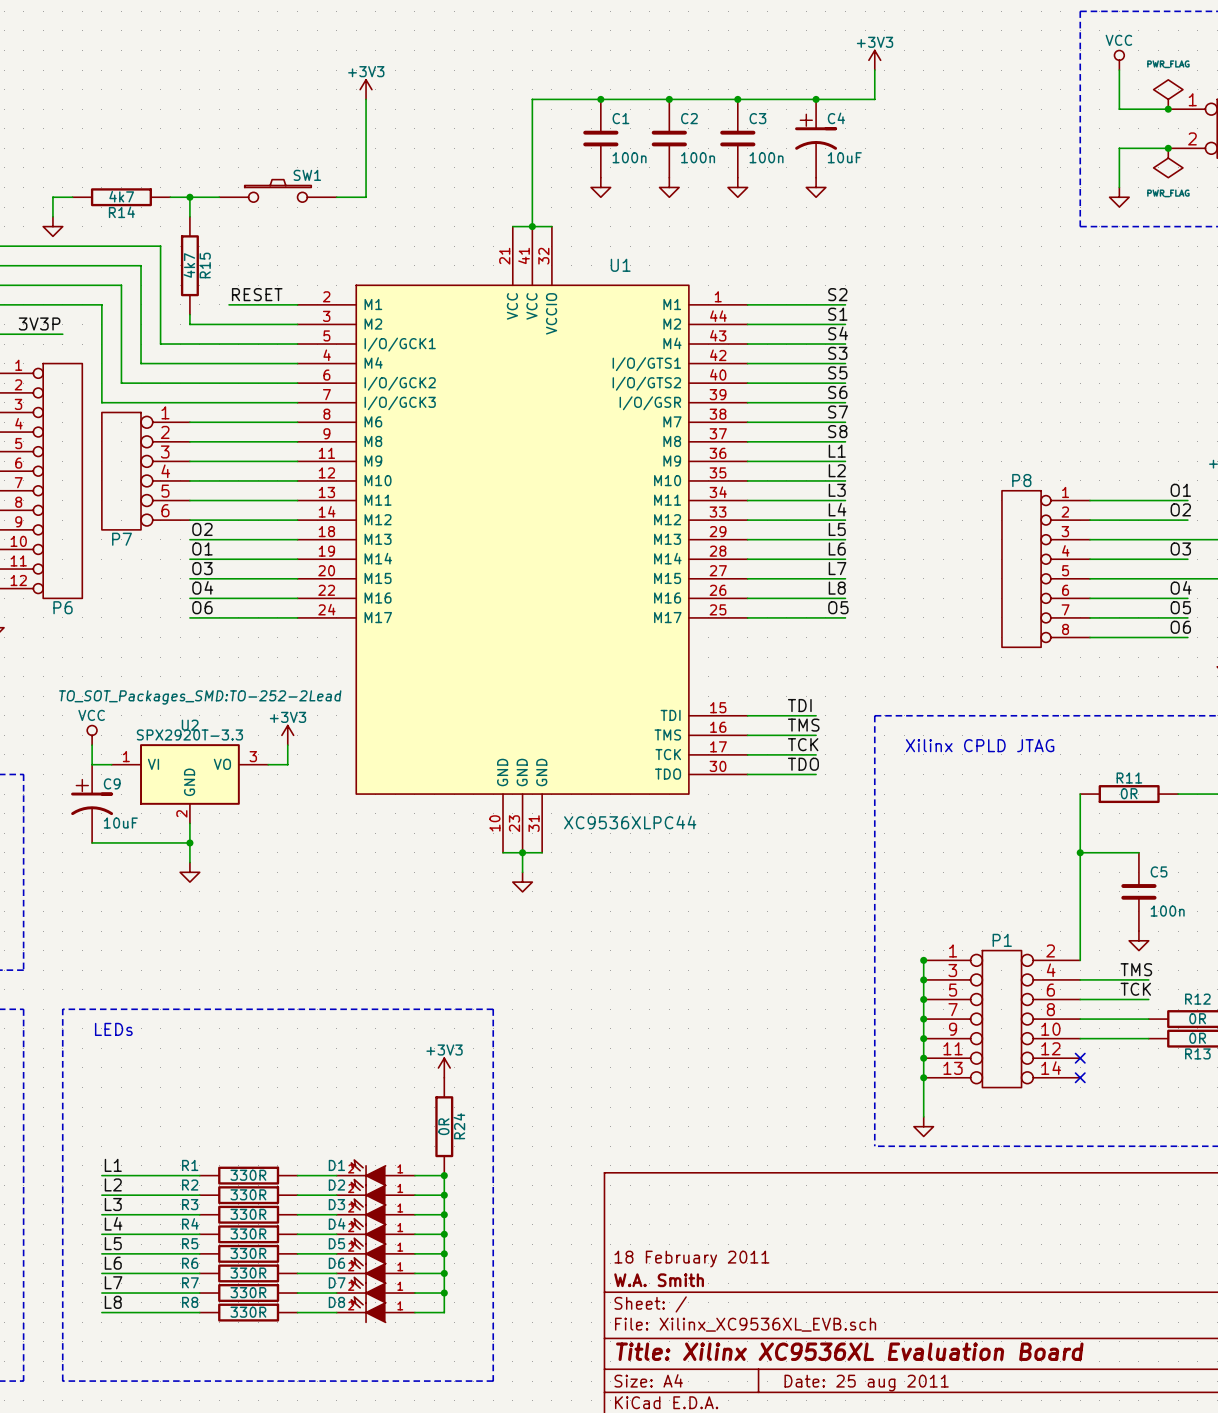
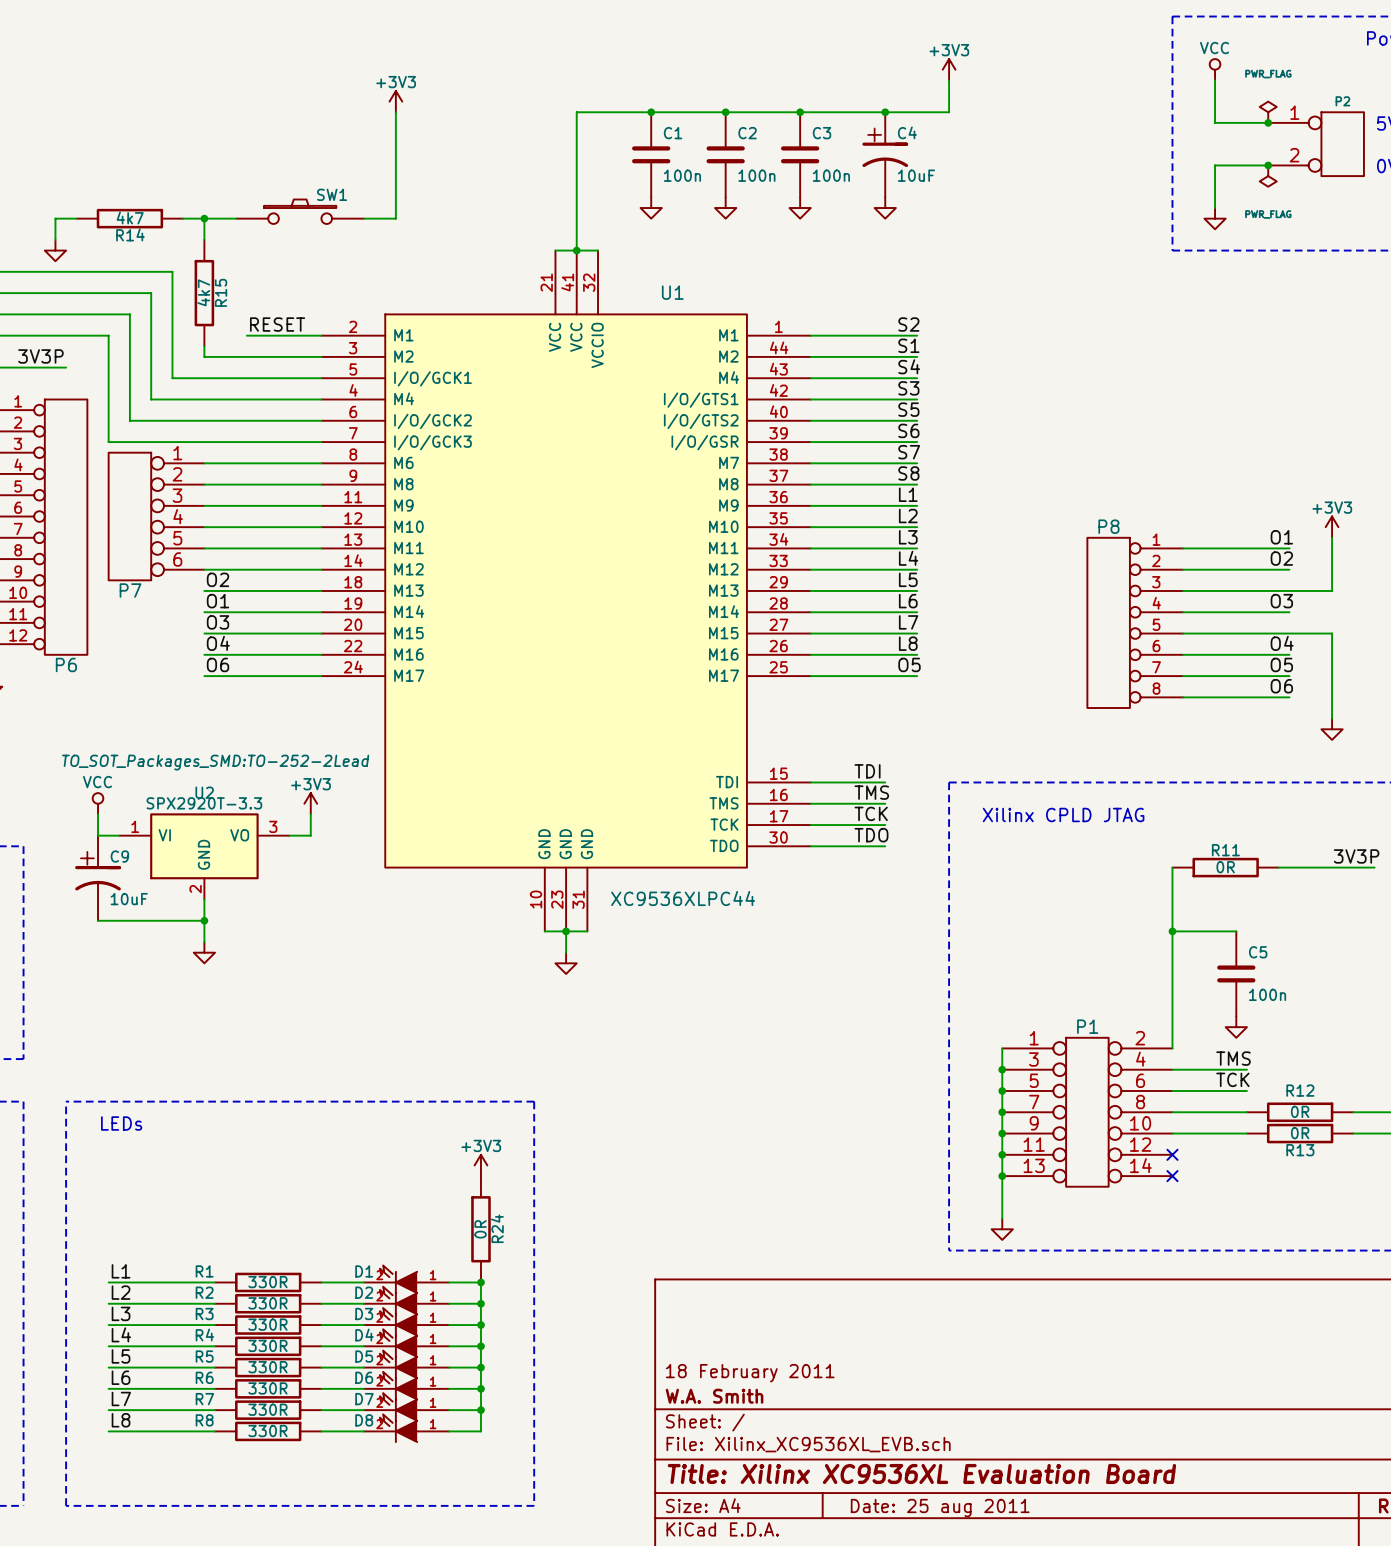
power symbol shape: [1153, 79, 1183, 110] -> [1259, 101, 1277, 123]
power symbol shape: [1153, 148, 1183, 178] -> [1259, 165, 1277, 187]
junction: (923, 960) -> none

